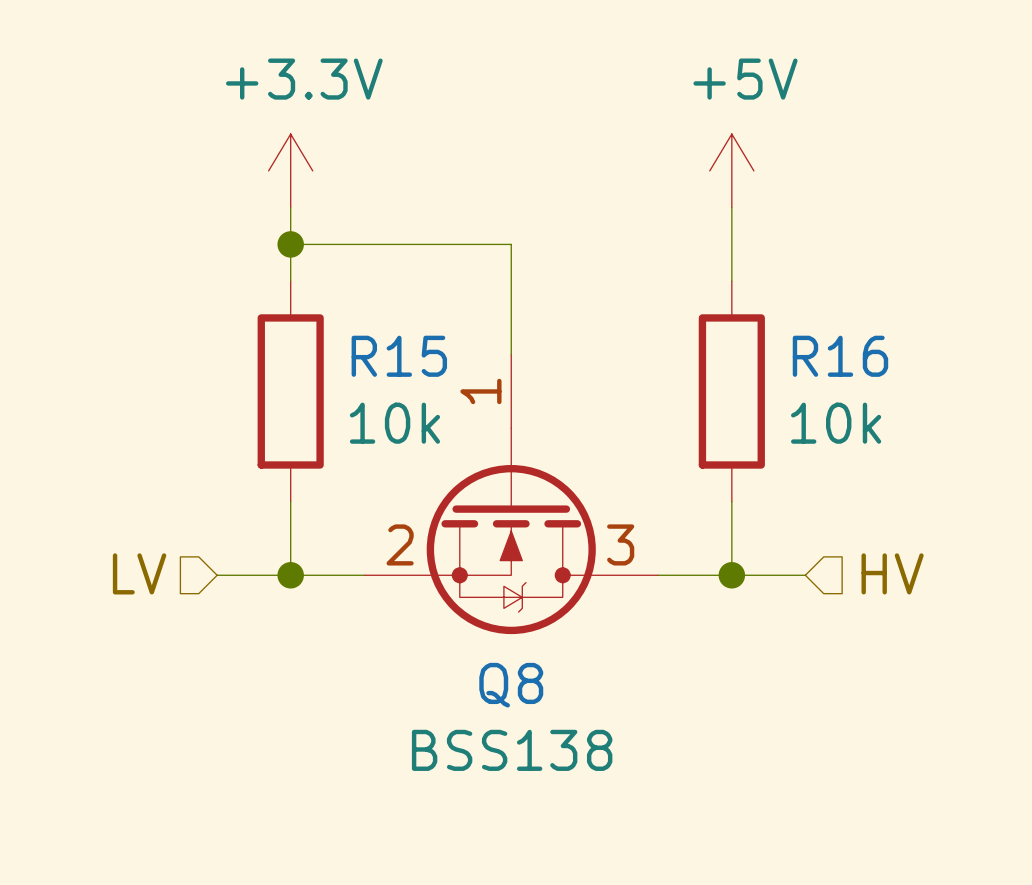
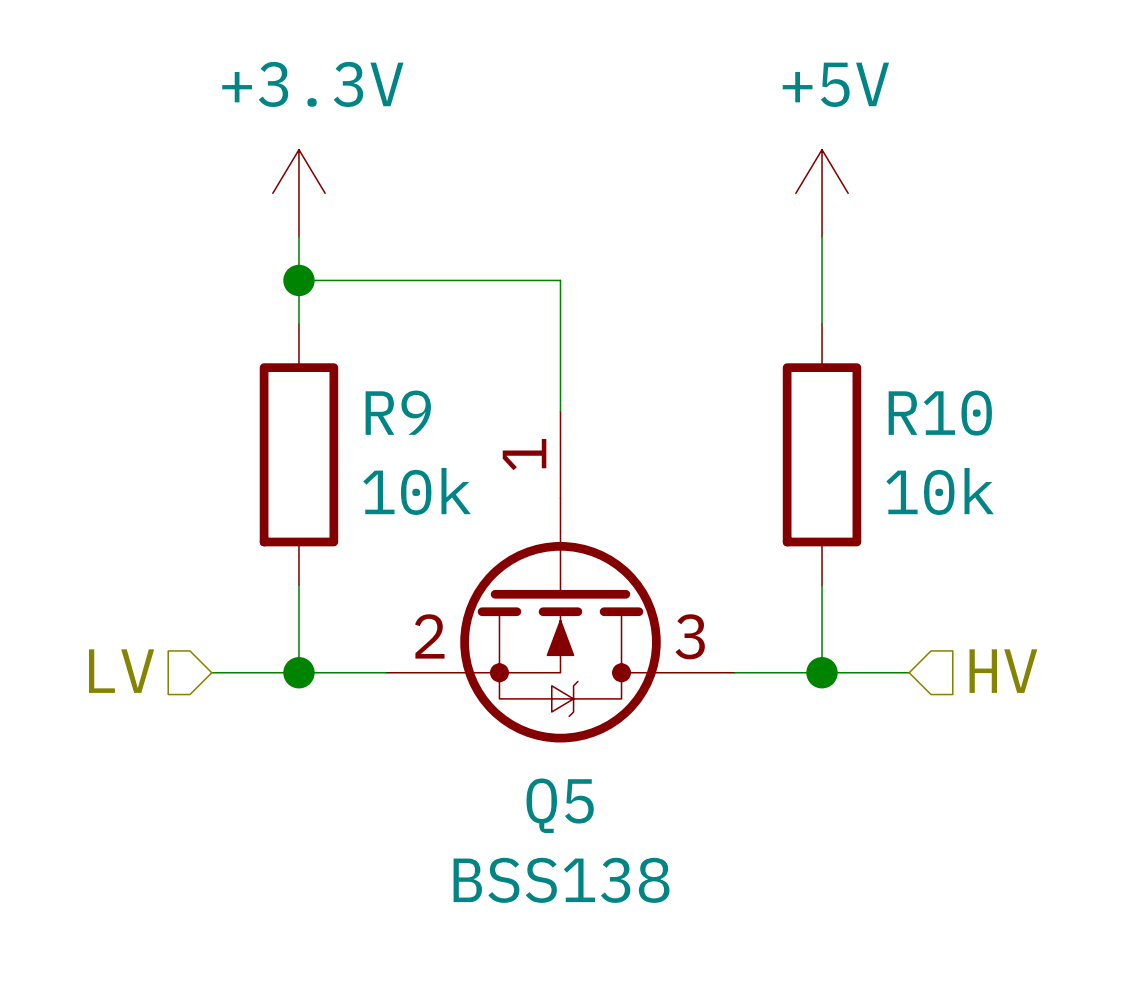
R15 name: R15 (399, 356) -> R9 (398, 412)
R16 name: R16 (840, 356) -> R10 (940, 413)
Q8 name: Q8 (511, 685) -> Q5 (560, 805)

